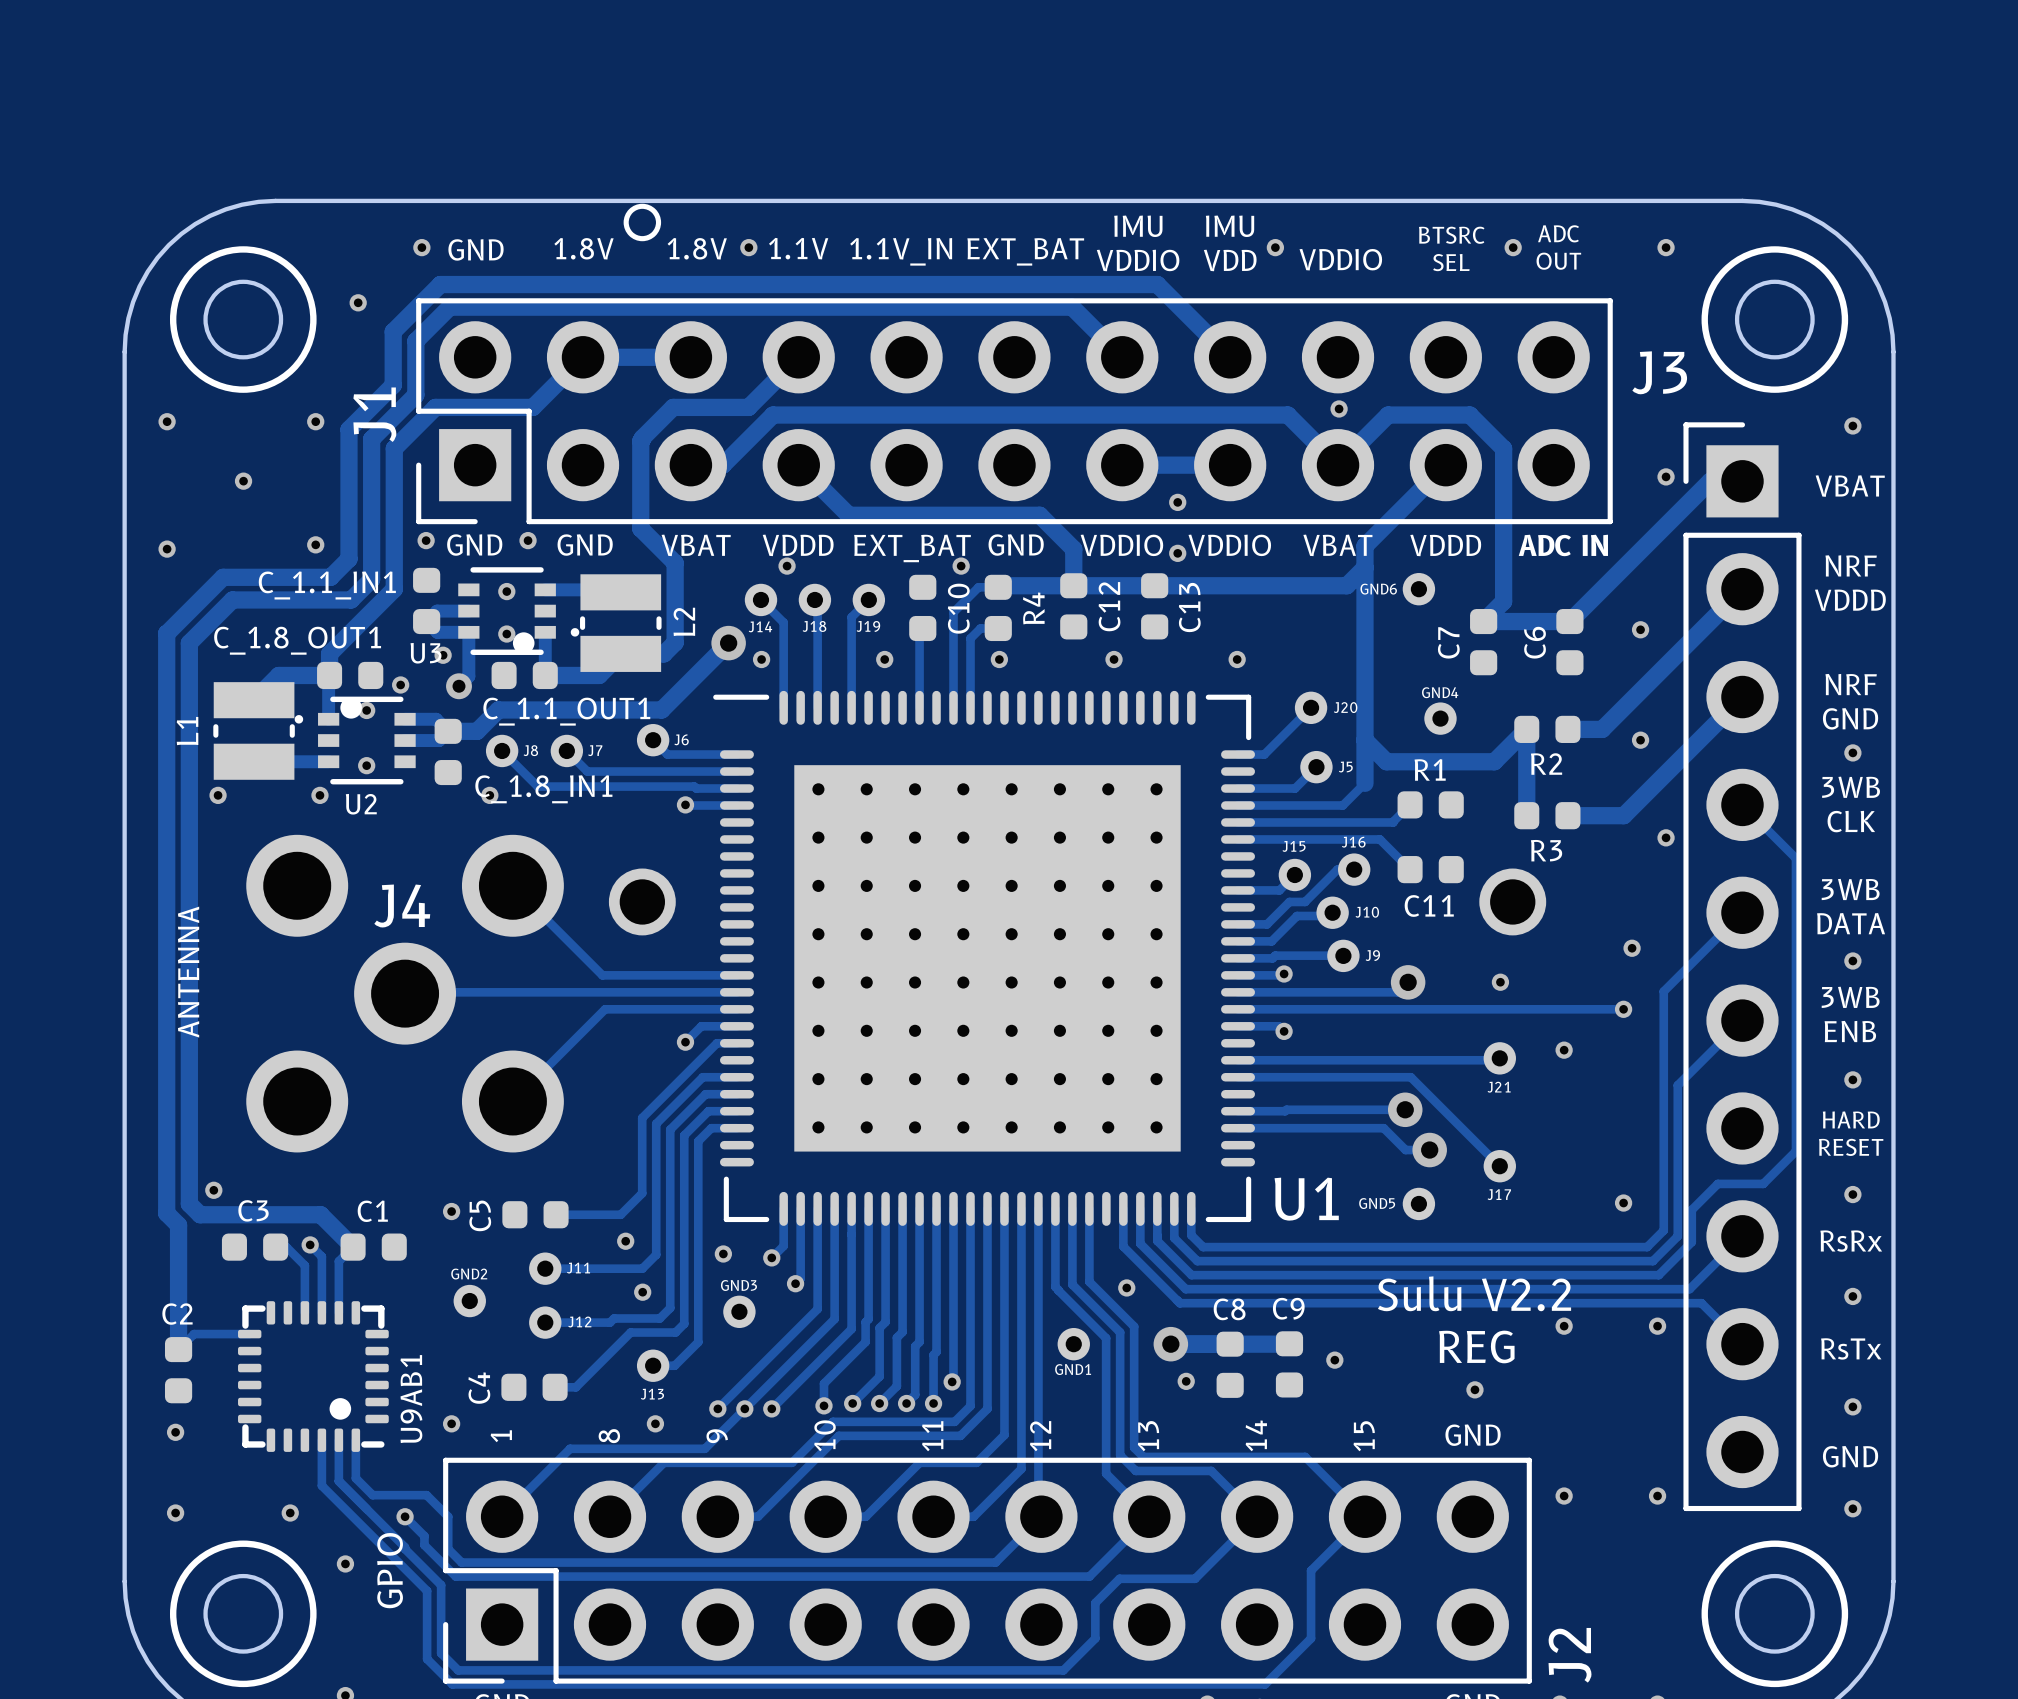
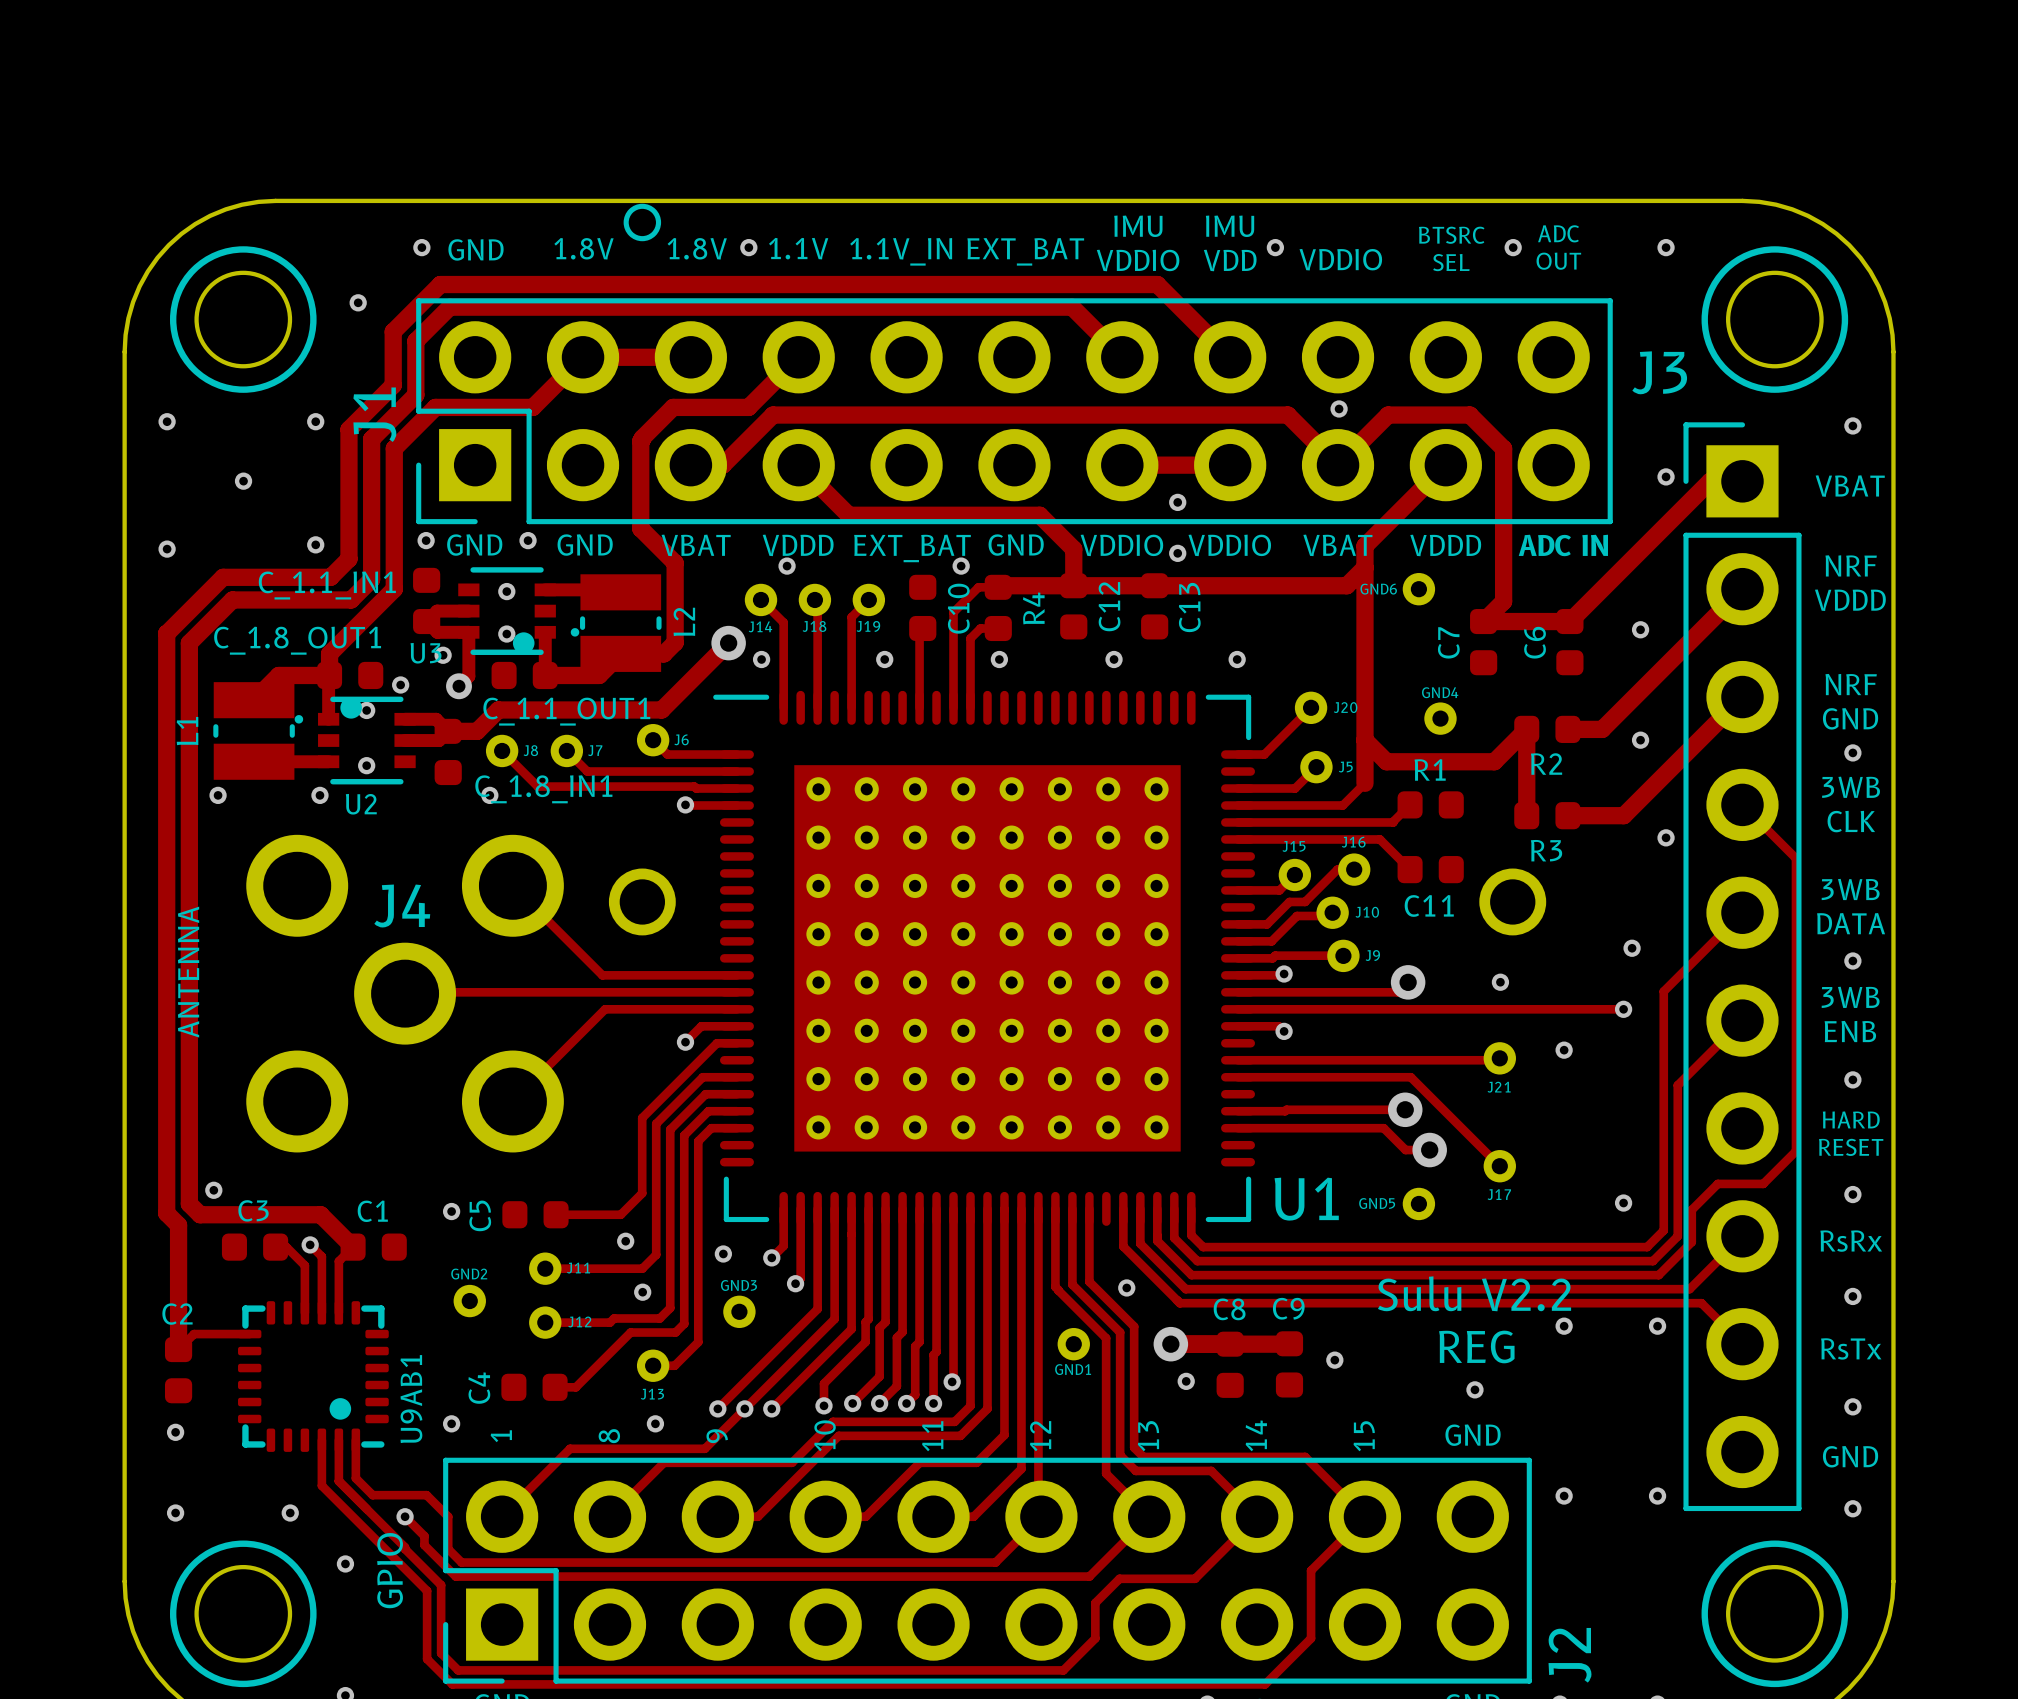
round board edge size: [203, 279, 284, 360] -> [194, 270, 293, 369]
round board edge size: [1734, 279, 1815, 360] -> [1726, 270, 1824, 369]
round board edge size: [203, 1573, 284, 1654] -> [194, 1564, 293, 1663]
round board edge size: [1734, 1573, 1815, 1654] -> [1726, 1564, 1824, 1663]

